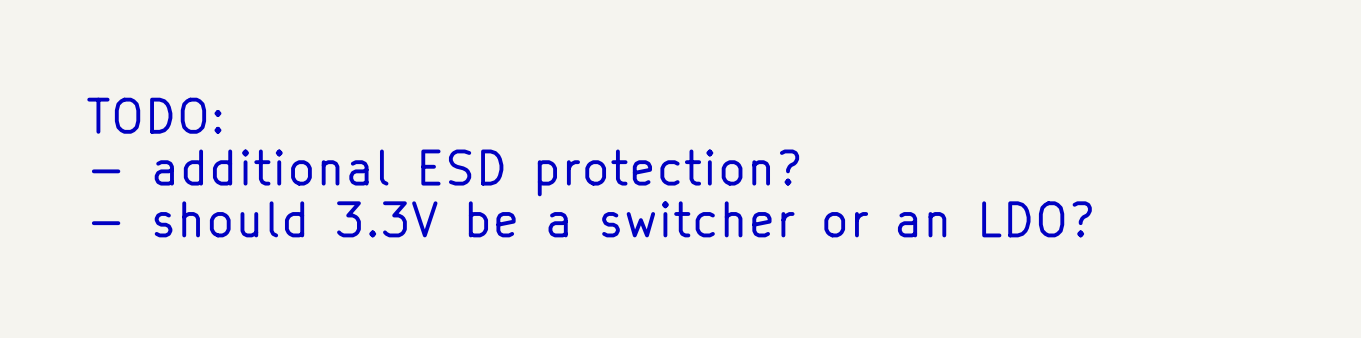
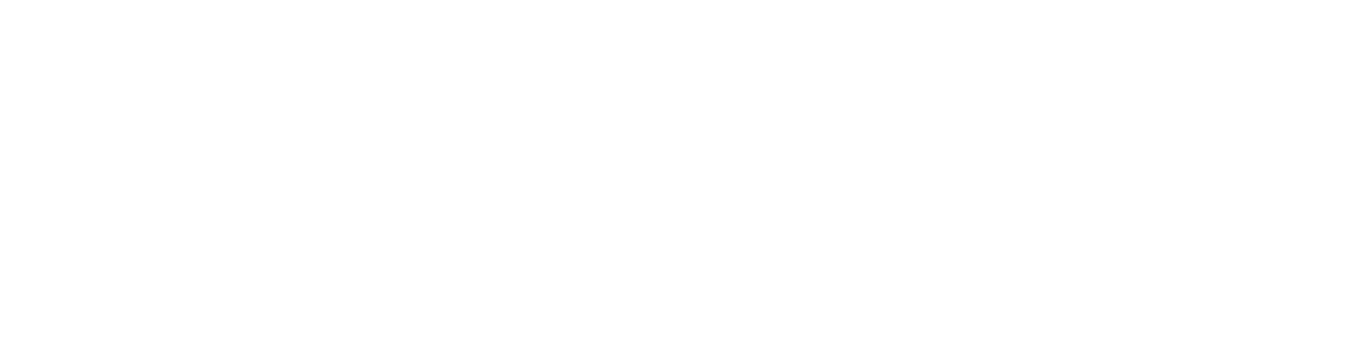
text: TODO: (154, 115) -> none
text: - additional ESD protection? (445, 172) -> none
text: - should 3.3V be a switcher or an LDO? (591, 219) -> none

